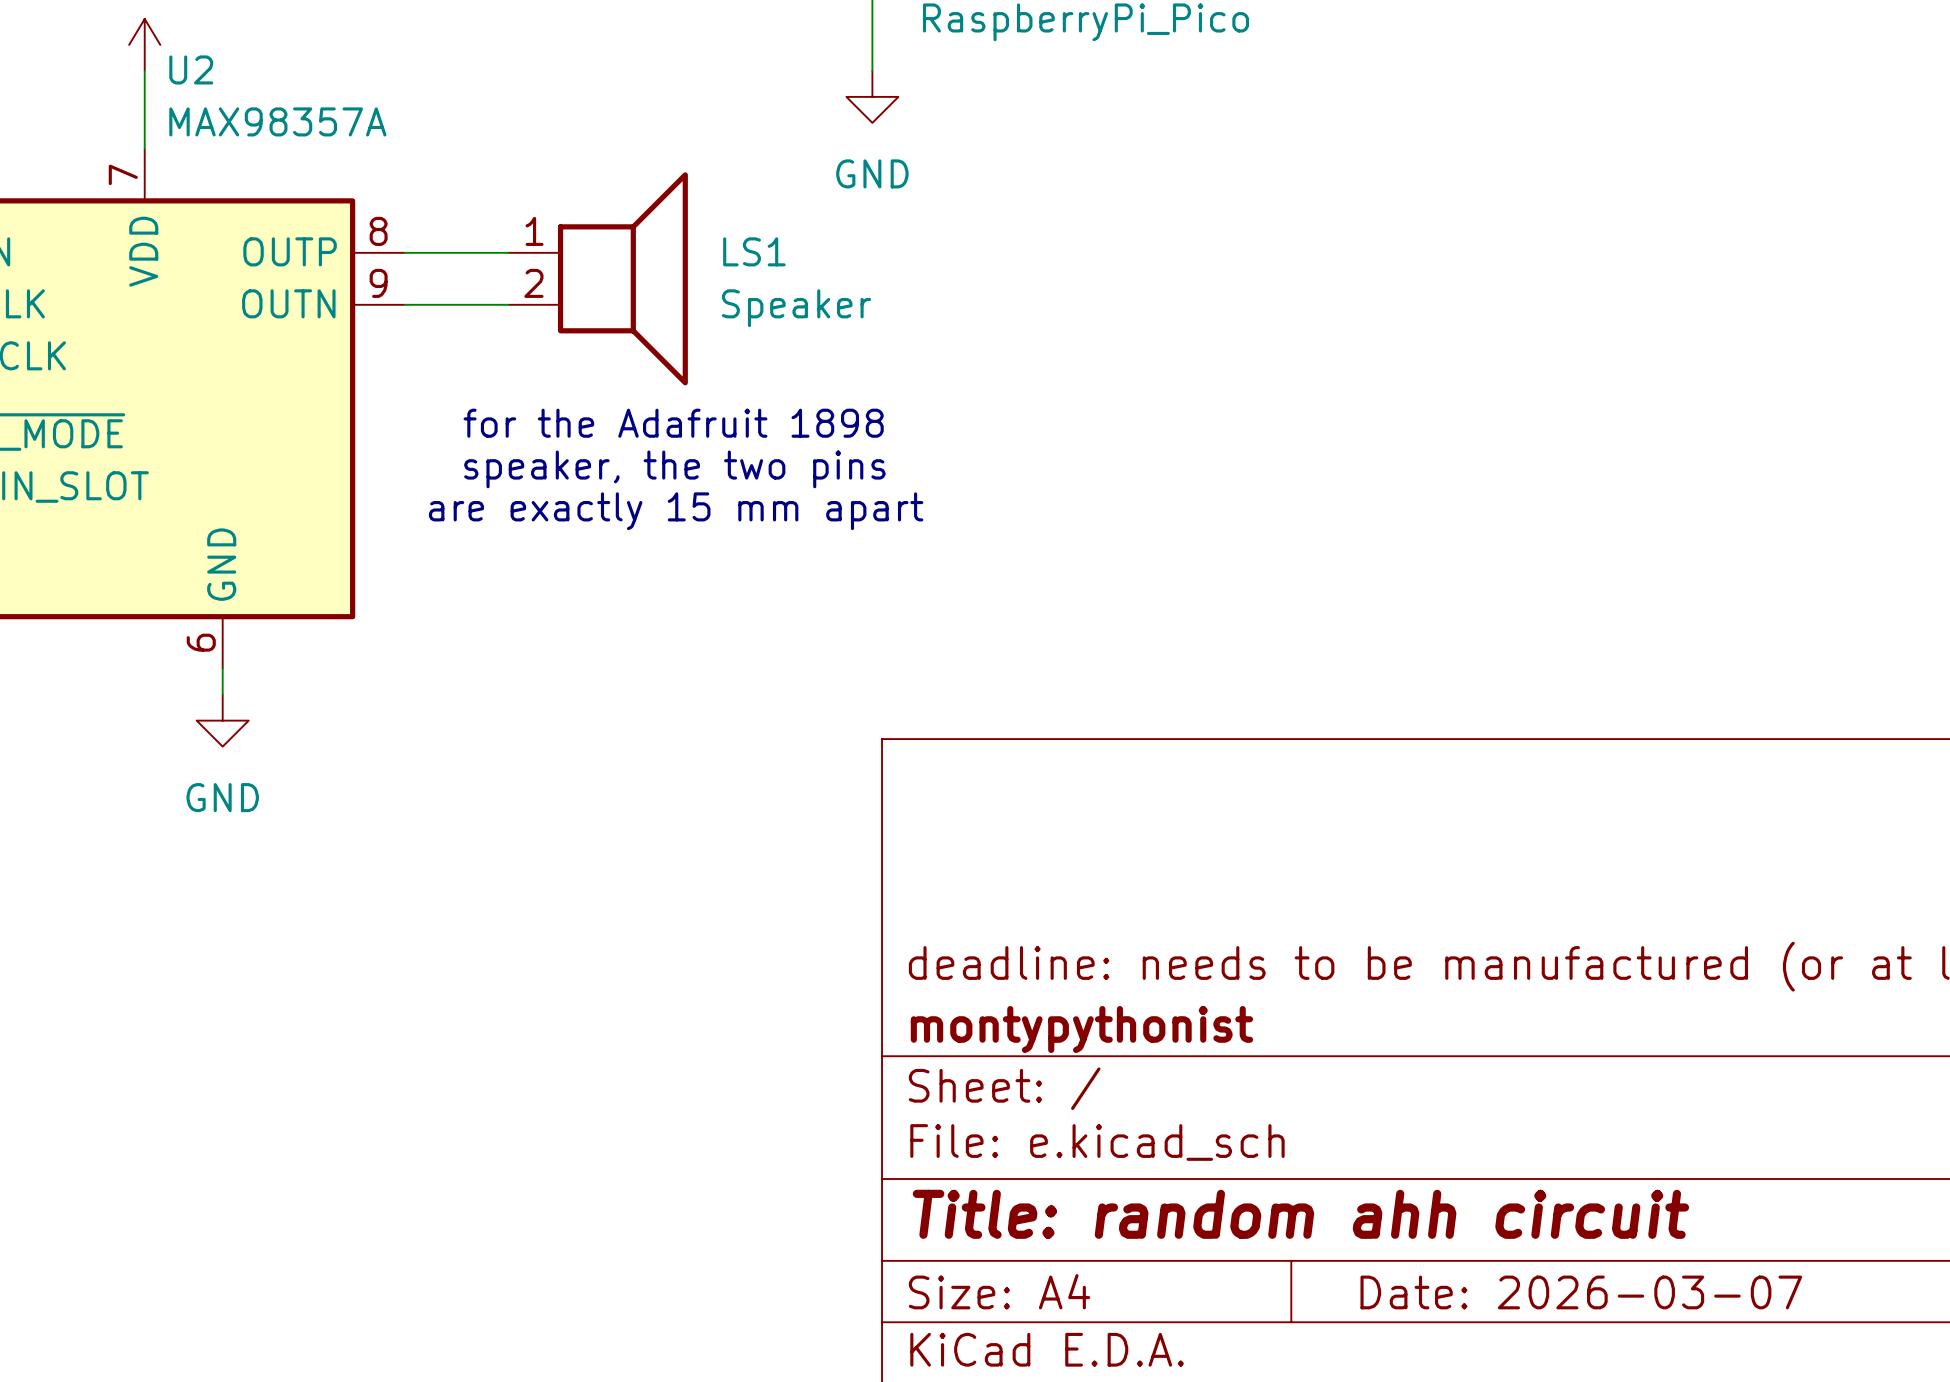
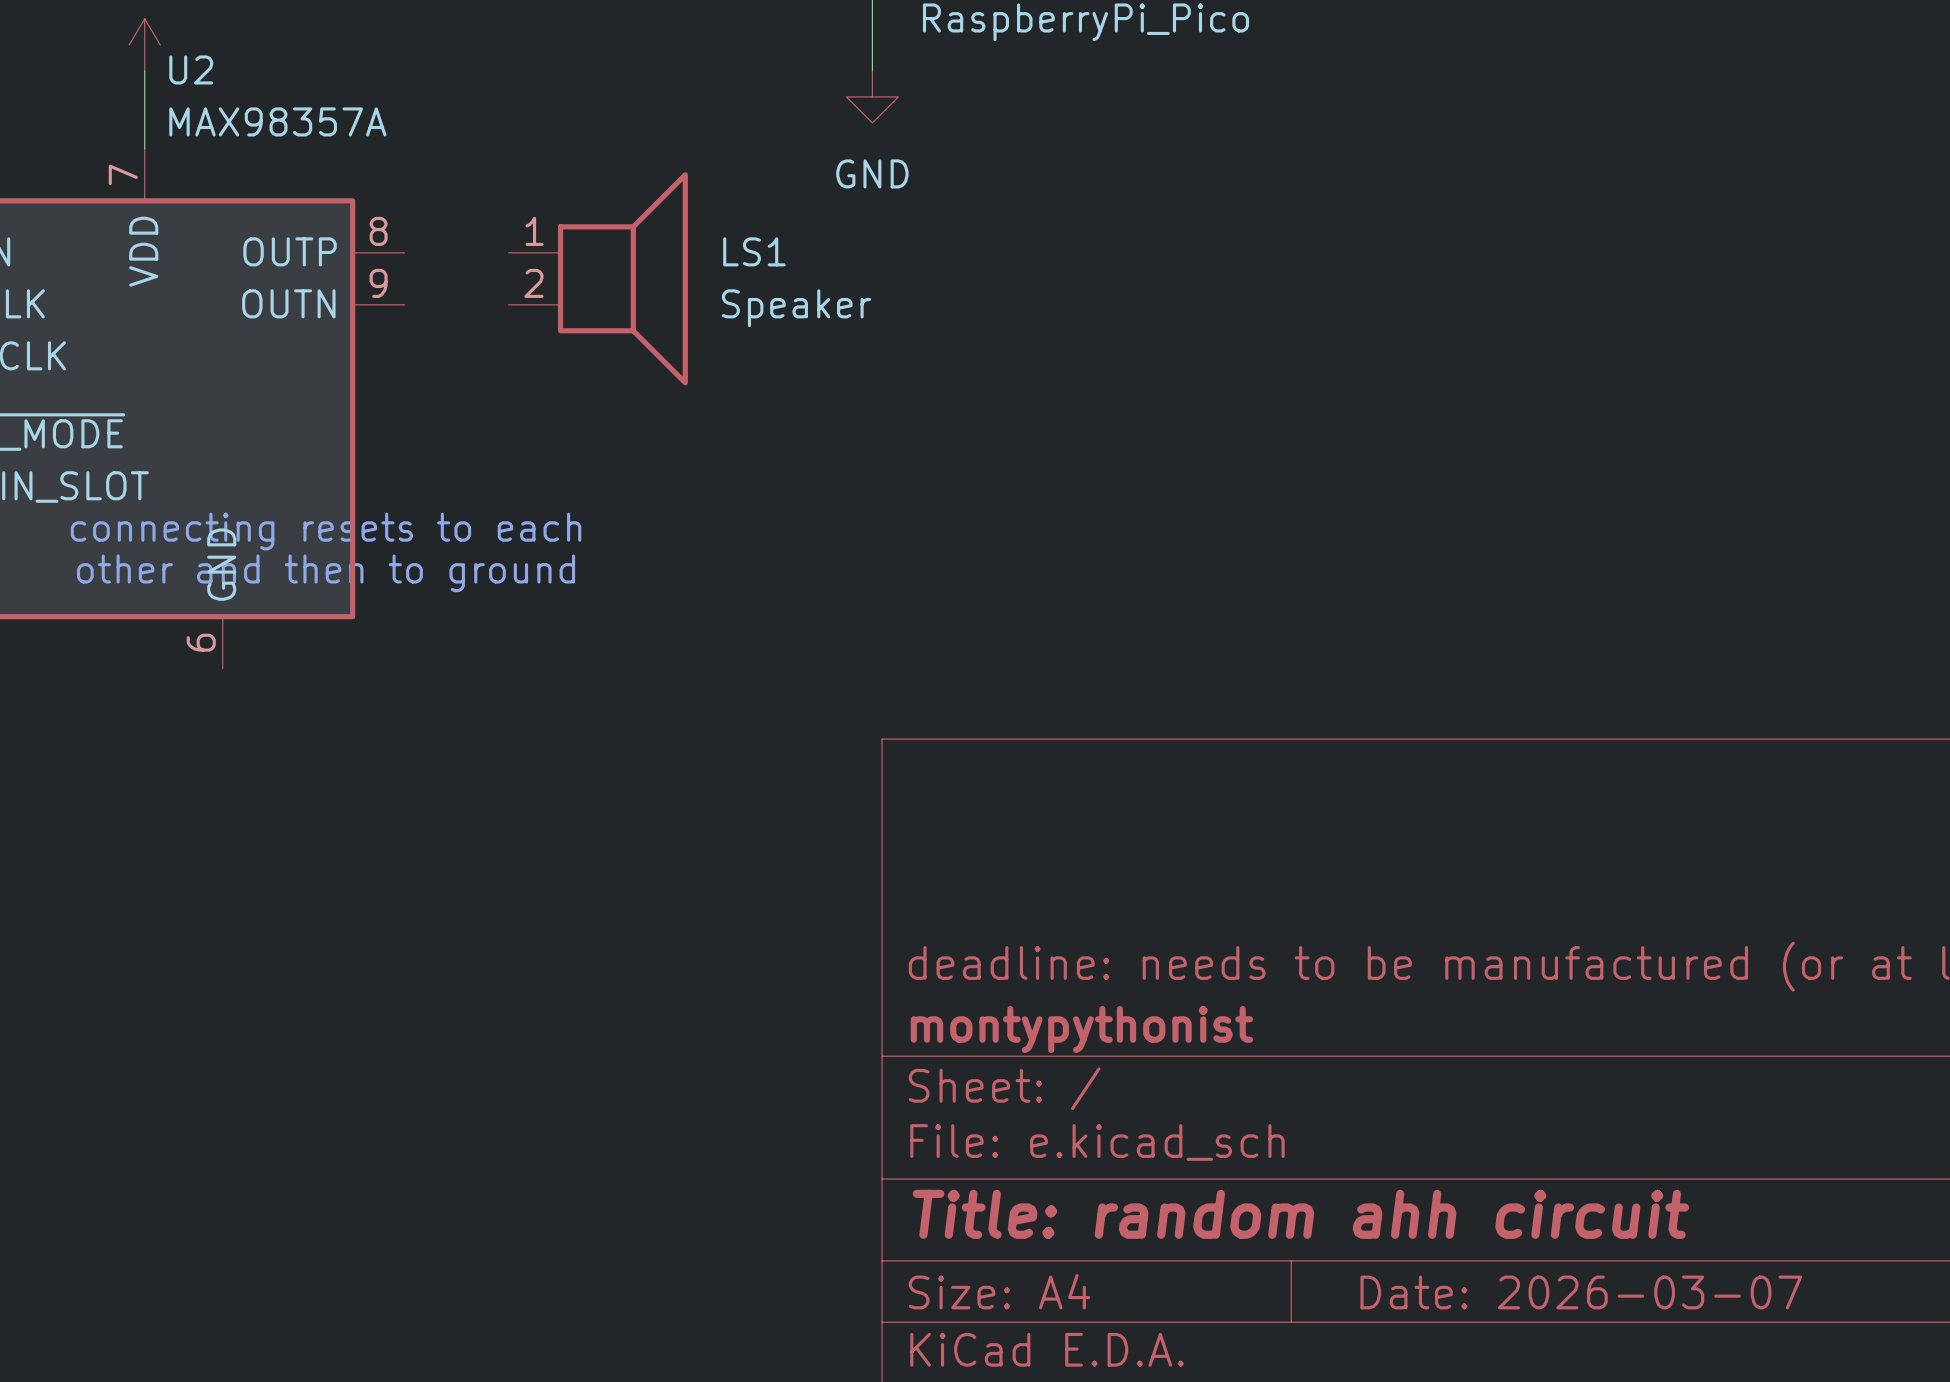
wire: (404, 252) (508, 252) -> none
wire: (404, 304) (508, 304) -> none
text: for the Adafruit 1898 (673, 423) -> none
text: speaker, the two pins (674, 469) -> none
text: are exactly 15 mm apart (676, 511) -> none
text: none -> connecting resets to each (326, 531)
text: none -> other and then to ground (326, 573)
wire: (222, 668) (222, 694) -> none
power symbol: GND (222, 720) -> none

